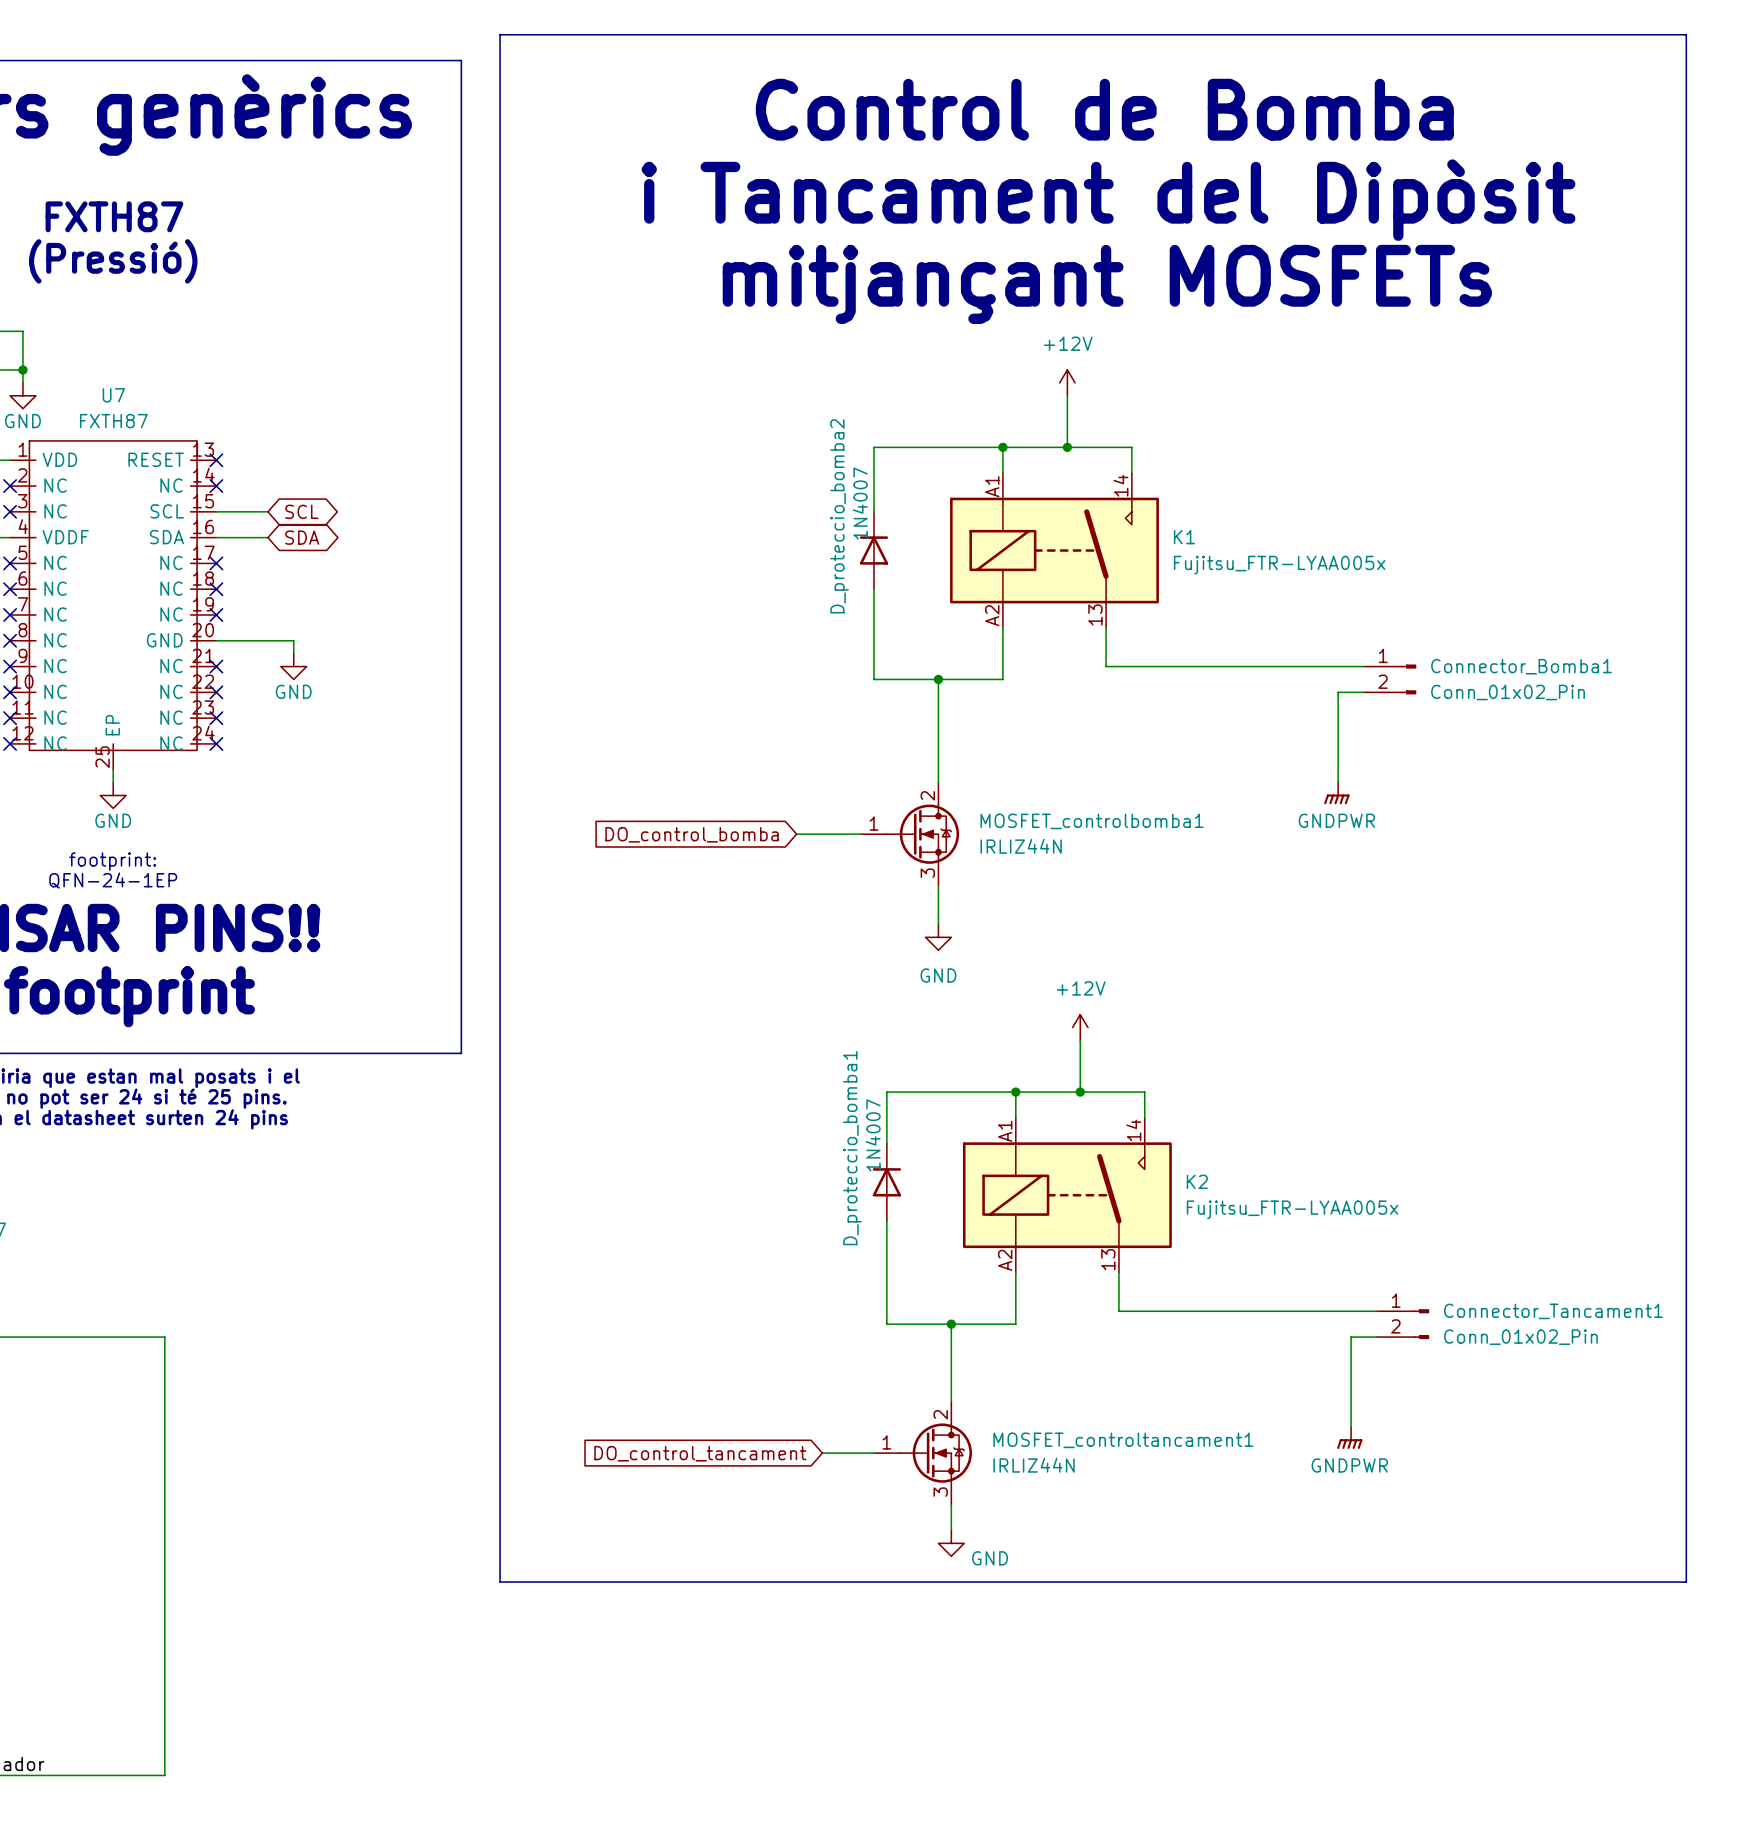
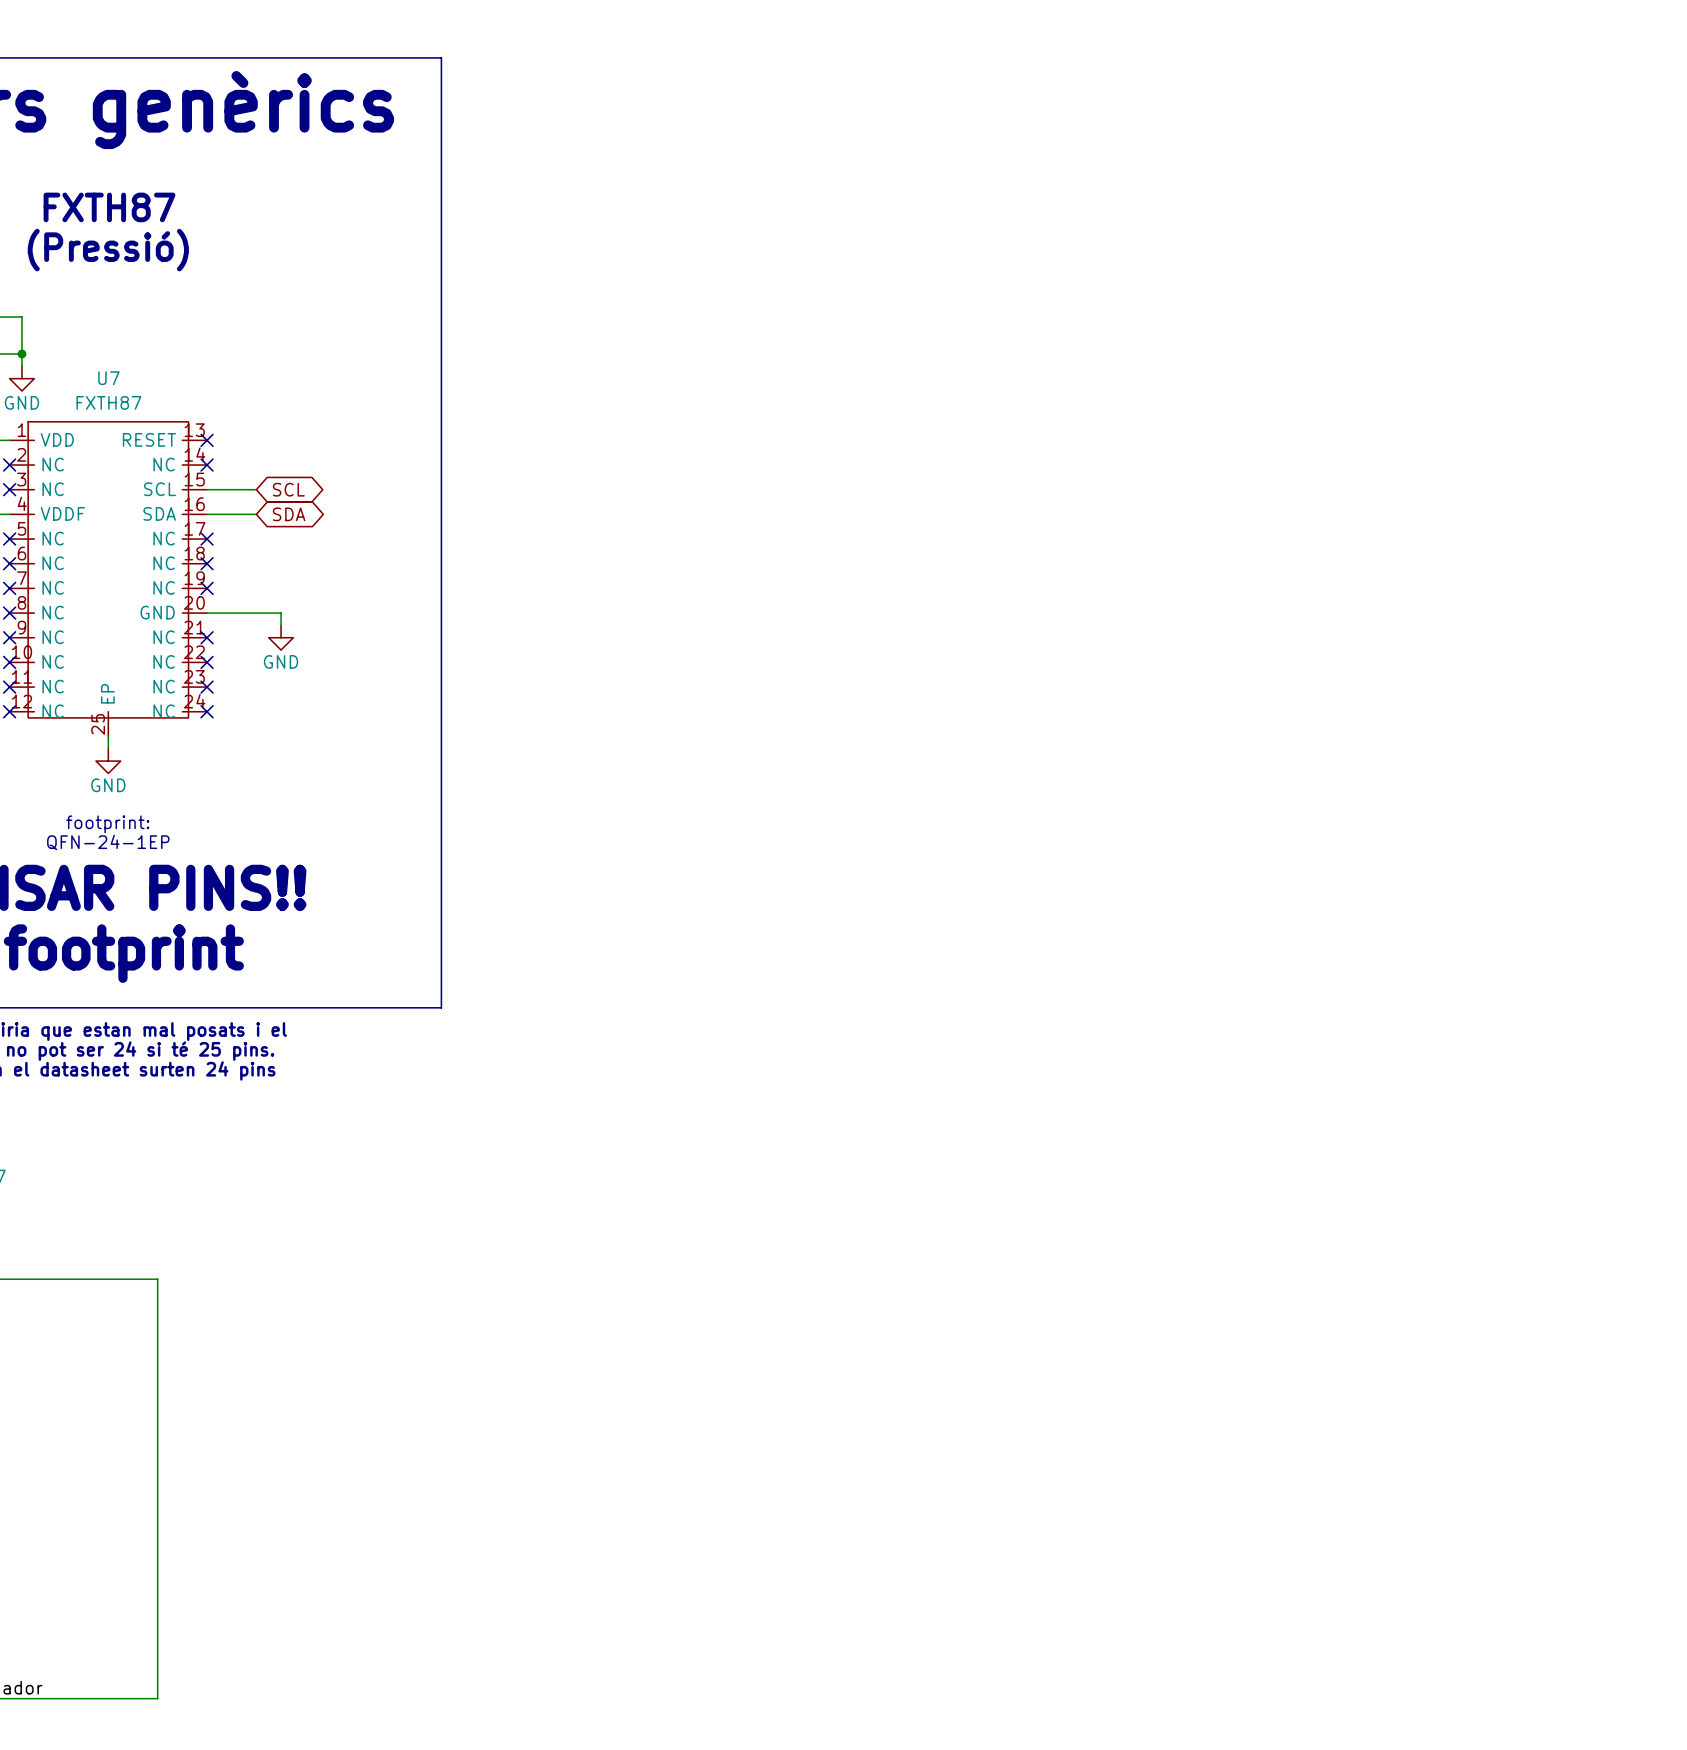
bus: (500, 34) (1686, 34) (1686, 1582) (500, 1582) (500, 34) -> none
text: Control de Bomba (1104, 109) -> none
text: i Tancament del Dipòsit (1108, 200) -> none
text: mitjançant MOSFETs (1107, 284) -> none
power symbol: +12V (1067, 382) -> none
wire: (1067, 395) (1067, 447) -> none
wire: (1002, 447) (1002, 473) -> none
junction: (1002, 447) -> none
junction: (1067, 447) -> none
wire: (1131, 473) (1131, 447) (873, 447) (873, 511) -> none
D_proteccio_bomba2: 1N4007 (873, 550) -> none
K1: Fujitsu_FTR-LYAA005x (1054, 550) -> none
wire: (873, 589) (873, 679) (1002, 679) (1002, 627) -> none
wire: (1106, 627) (1106, 666) (1363, 666) -> none
wire: (938, 679) (938, 782) -> none
junction: (938, 679) -> none
Connector_Bomba1: Conn_01x02_Pin (1390, 679) -> none
wire: (1363, 692) (1338, 692) (1338, 782) -> none
power symbol: GNDPWR (1336, 793) -> none
global label: DO_control_bomba (692, 834) -> none
wire: (796, 834) (861, 834) -> none
MOSFET_controlbomba1: IRLIZ44N (910, 834) -> none
wire: (938, 885) (938, 924) -> none
power symbol: GND (938, 937) -> none
power symbol: +12V (1080, 1027) -> none
wire: (1080, 1040) (1080, 1092) -> none
wire: (1015, 1092) (1015, 1117) -> none
junction: (1015, 1092) -> none
junction: (1080, 1092) -> none
wire: (1144, 1117) (1144, 1092) (886, 1092) (886, 1143) -> none
D_proteccio_bomba1: 1N4007 (886, 1182) -> none
K2: Fujitsu_FTR-LYAA005x (1067, 1195) -> none
wire: (886, 1221) (886, 1324) (1015, 1324) (1015, 1272) -> none
wire: (1118, 1272) (1118, 1311) (1376, 1311) -> none
wire: (951, 1324) (951, 1401) -> none
junction: (951, 1324) -> none
Connector_Tancament1: Conn_01x02_Pin (1403, 1324) -> none
wire: (1376, 1337) (1351, 1337) (1351, 1427) -> none
power symbol: GNDPWR (1349, 1438) -> none
global label: DO_control_tancament (700, 1453) -> none
wire: (822, 1453) (873, 1453) -> none
MOSFET_controltancament1: IRLIZ44N (922, 1453) -> none
wire: (951, 1504) (951, 1530) -> none
power symbol: GND (951, 1543) -> none

